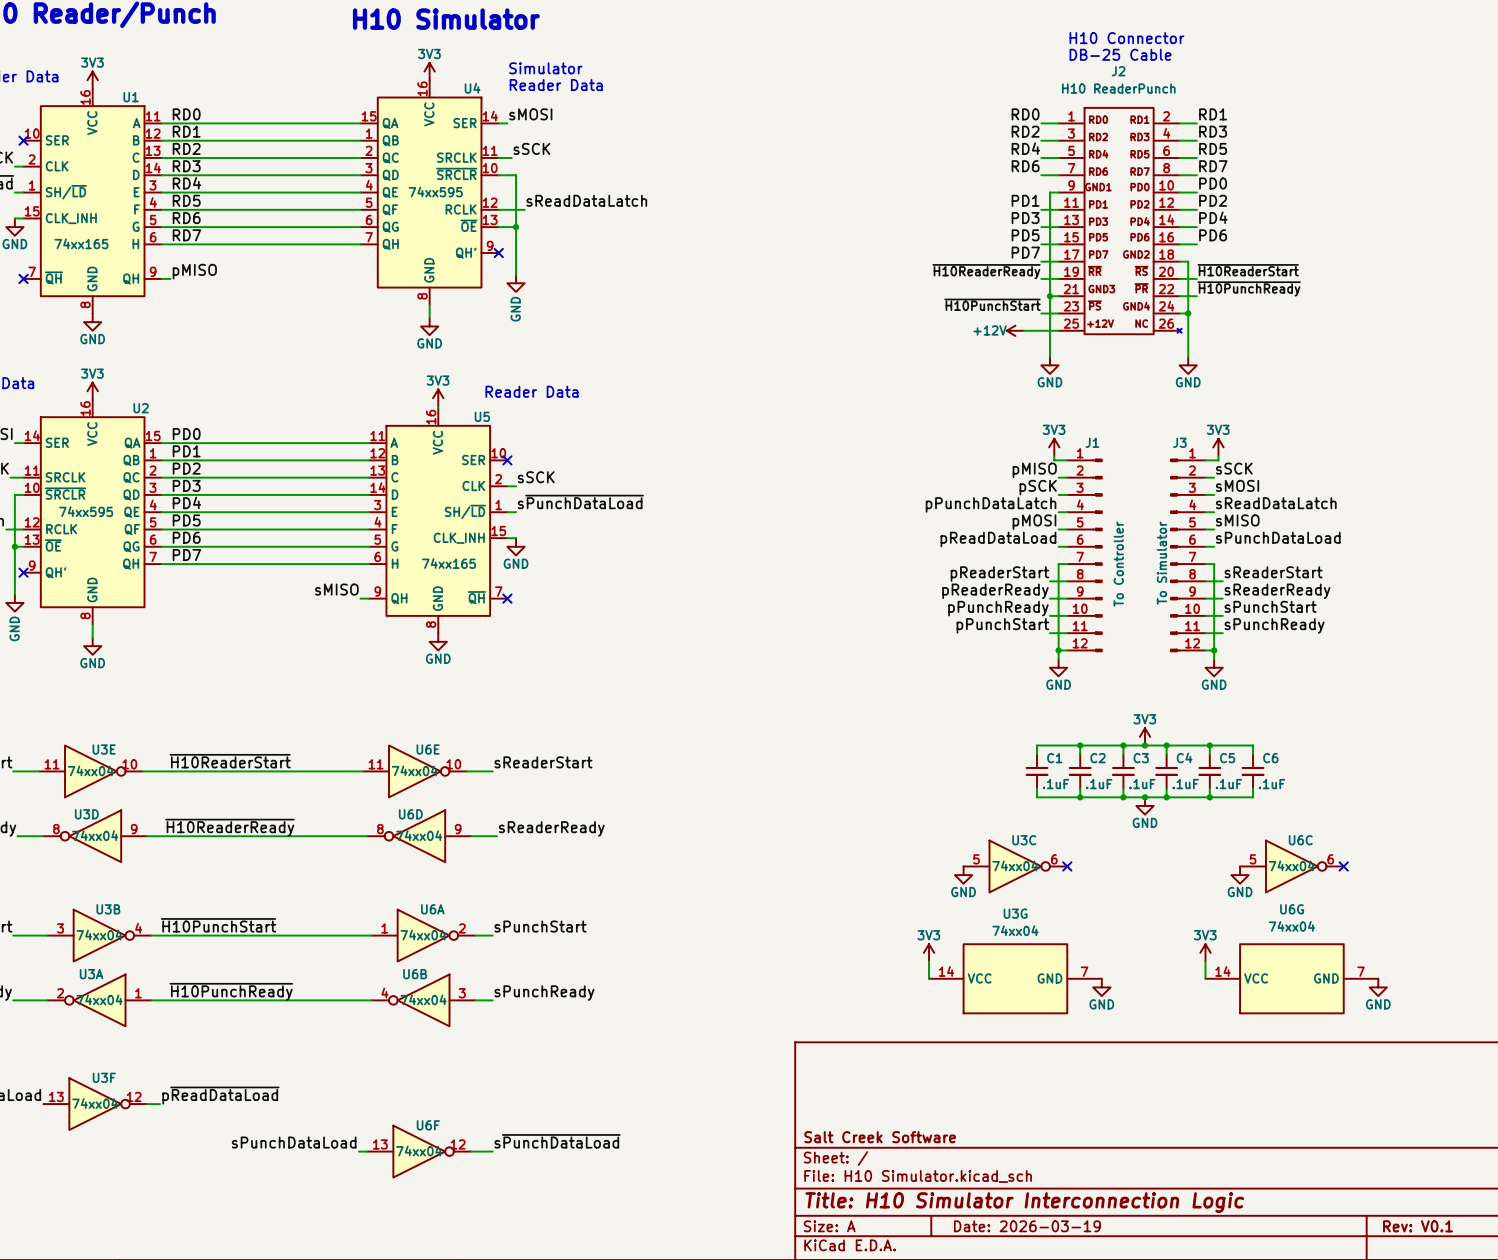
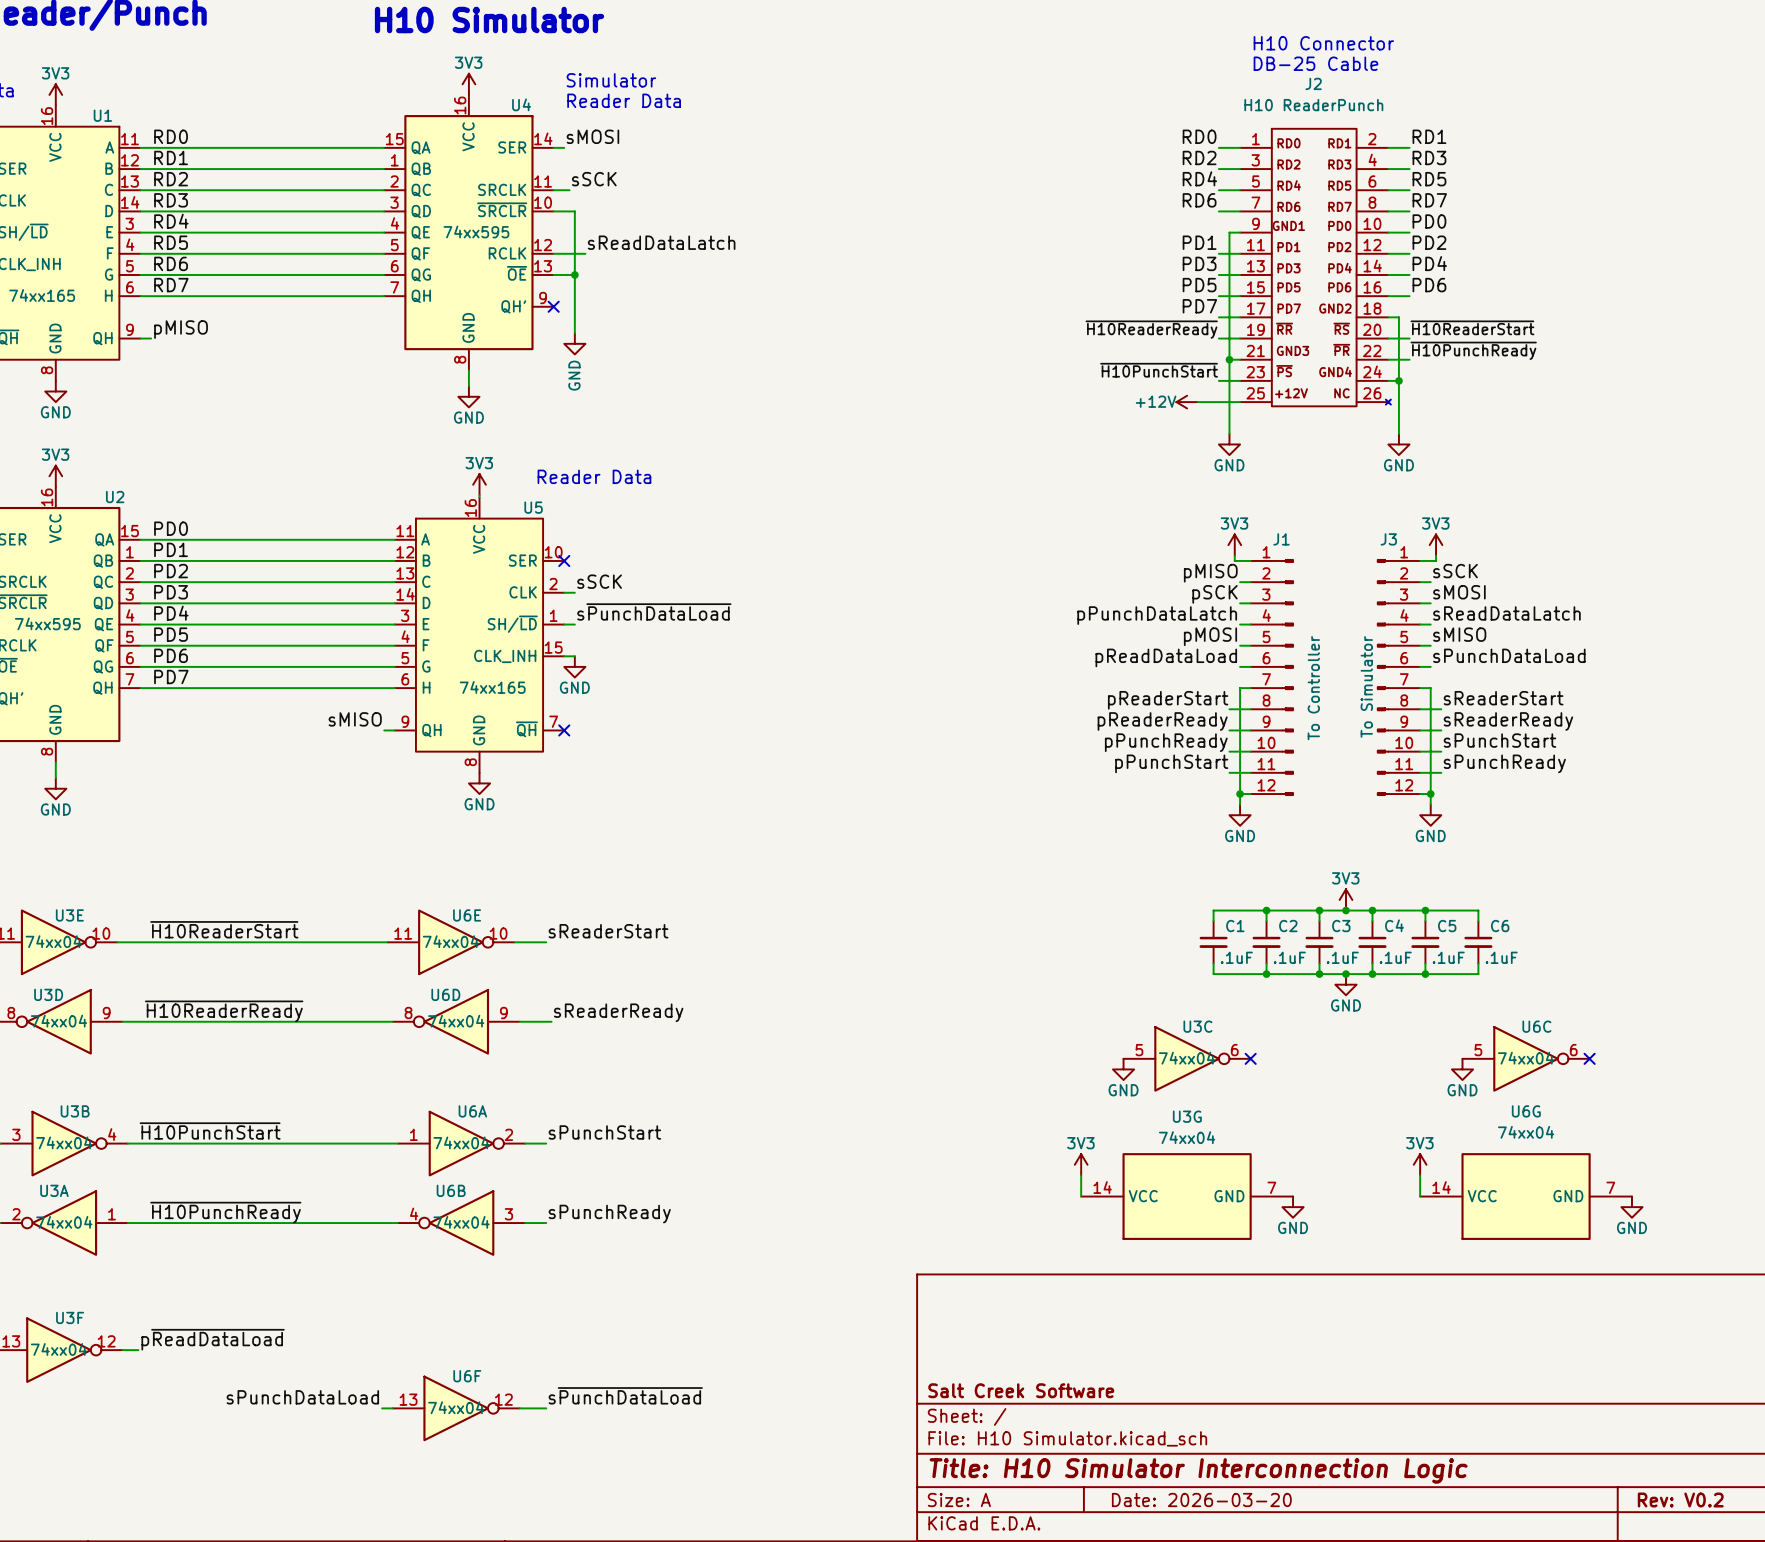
title block: Date: 2026-03-19 (1027, 1226) -> Date: 2026-03-20 (1201, 1500)
title block: Rev: V0.1 (1418, 1226) -> Rev: V0.2 (1680, 1500)

